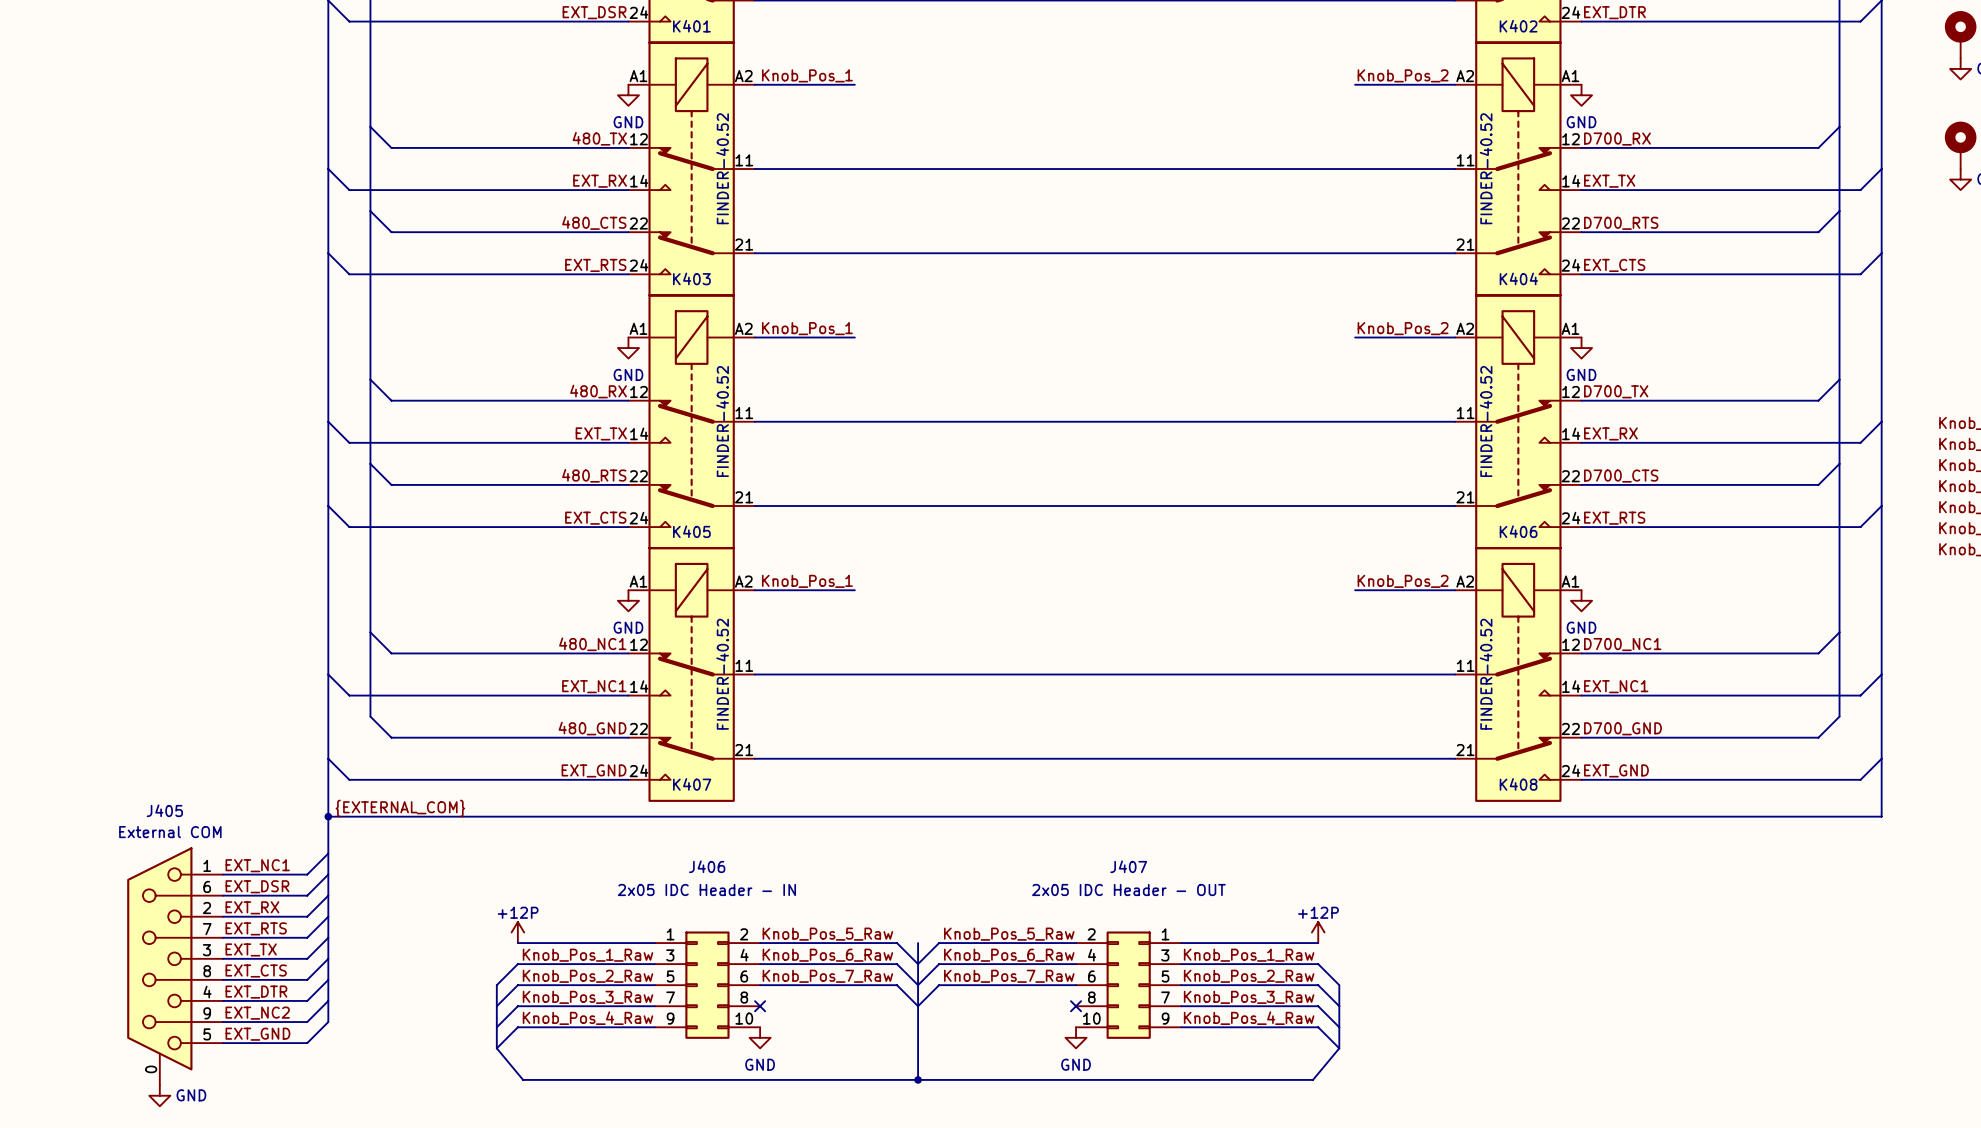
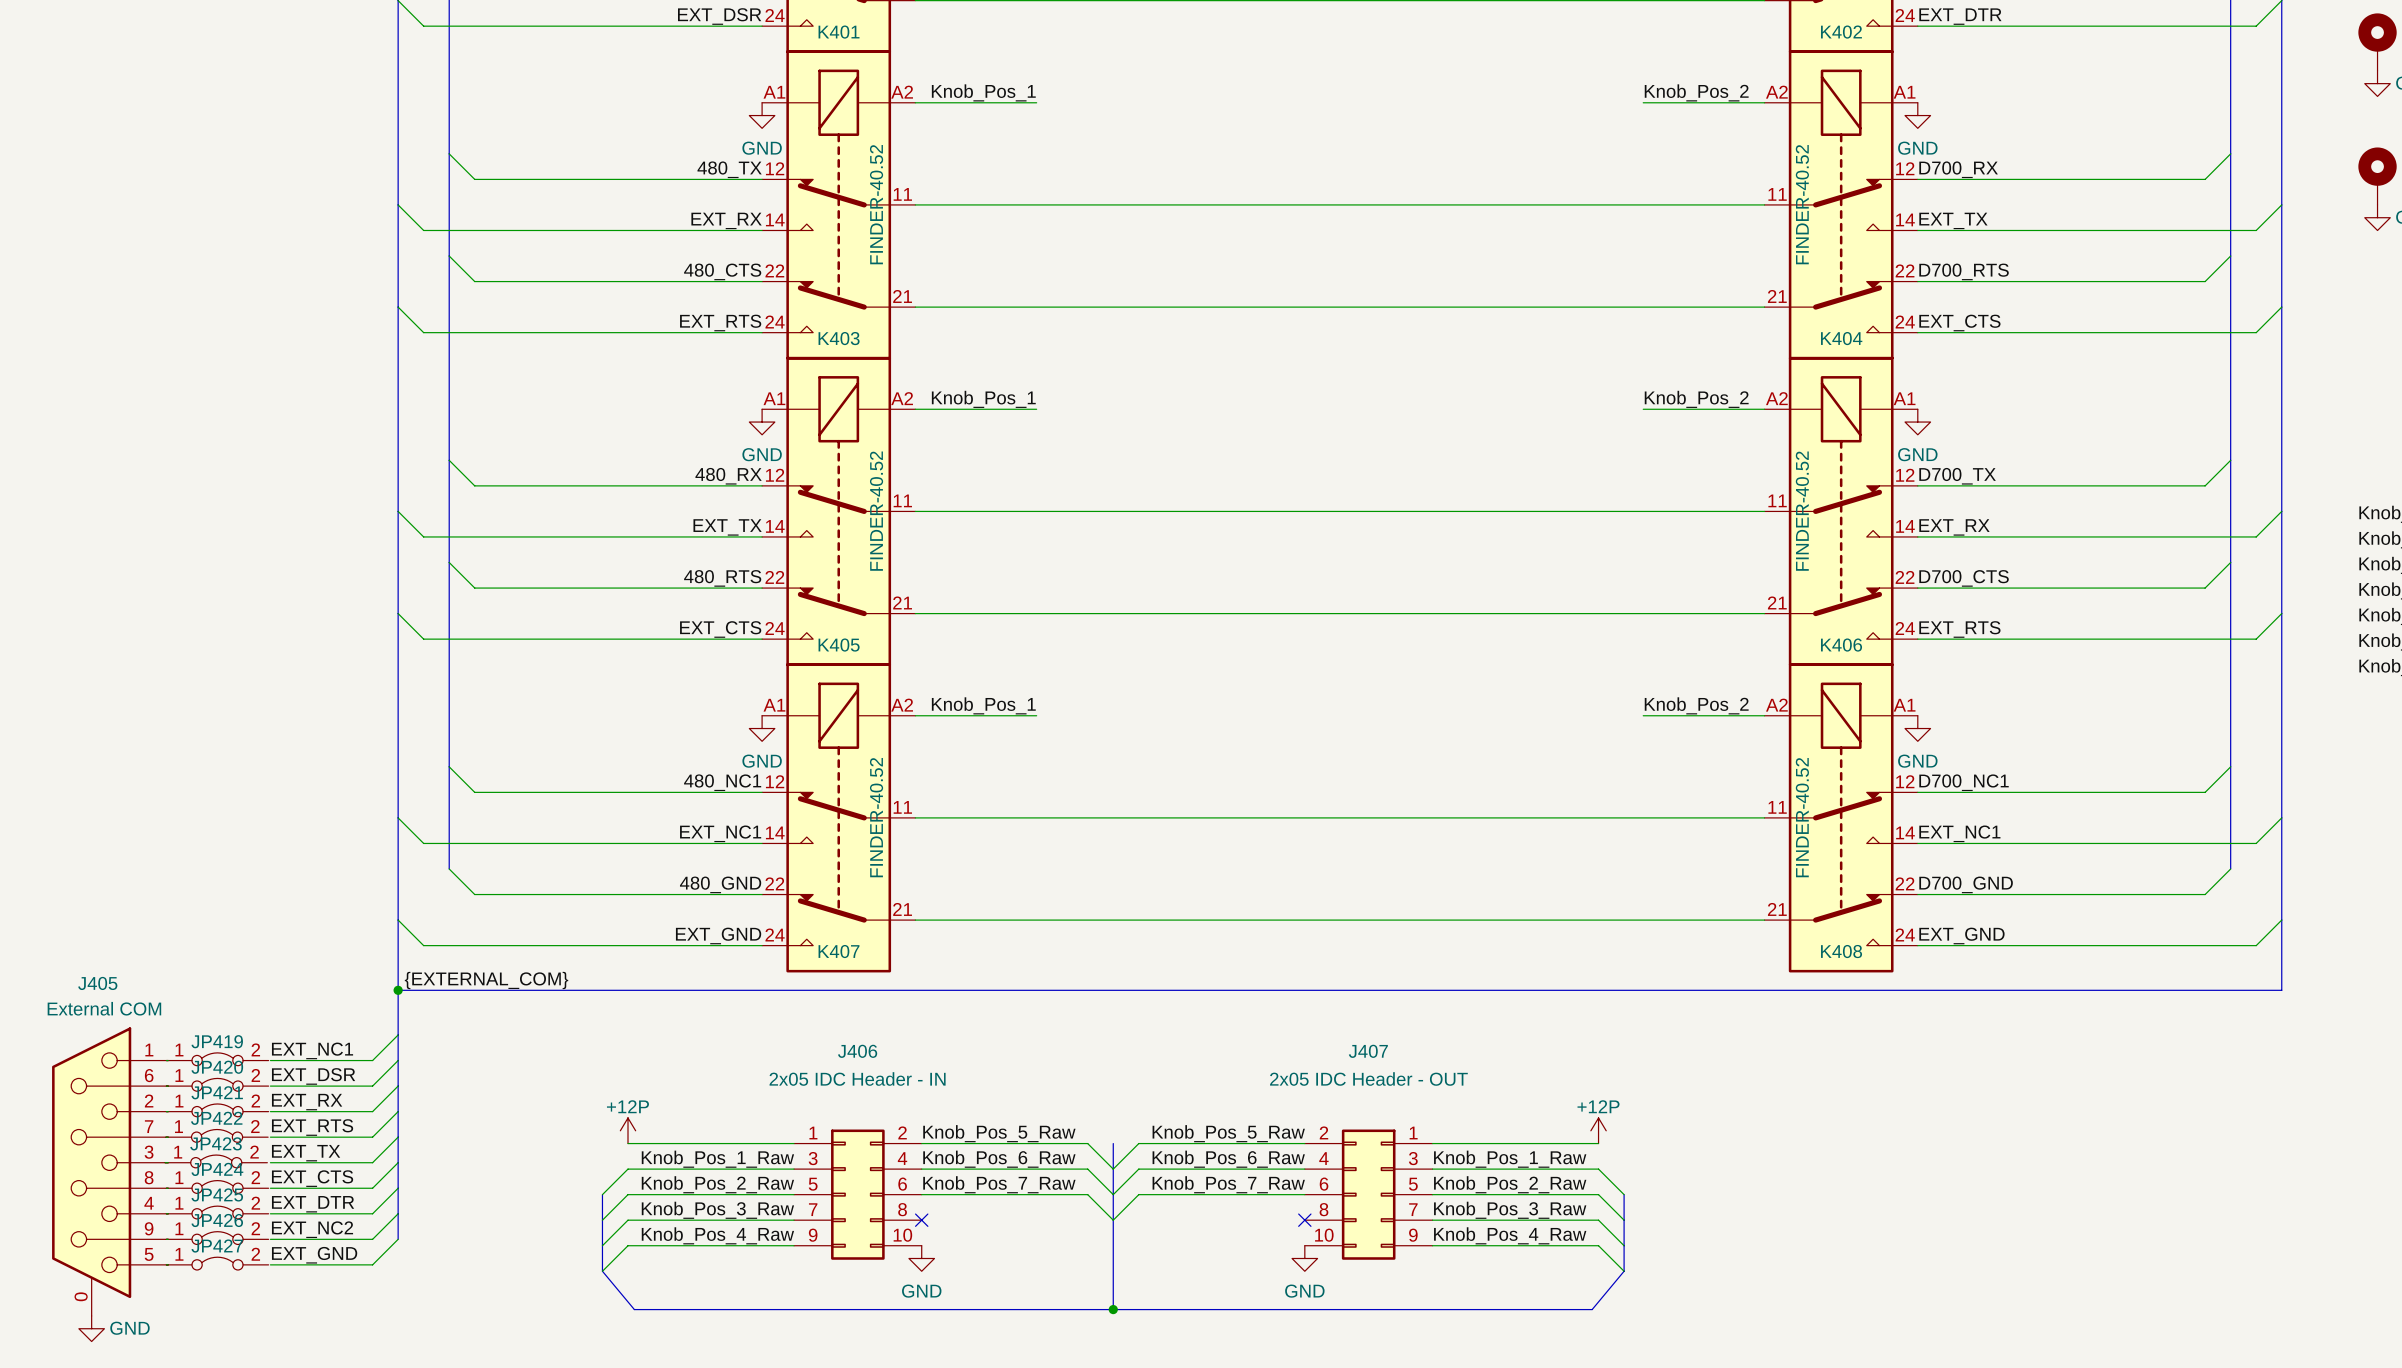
JP419: none -> (217, 1059)
JP420: none -> (217, 1084)
JP421: none -> (217, 1110)
JP422: none -> (217, 1135)
JP423: none -> (216, 1161)
J405 position: (175, 966) -> (110, 1171)
JP424: none -> (217, 1186)
JP425: none -> (217, 1212)
JP426: none -> (217, 1238)
JP427: none -> (217, 1263)
power symbol position: GND (159, 1095) -> GND (91, 1328)

